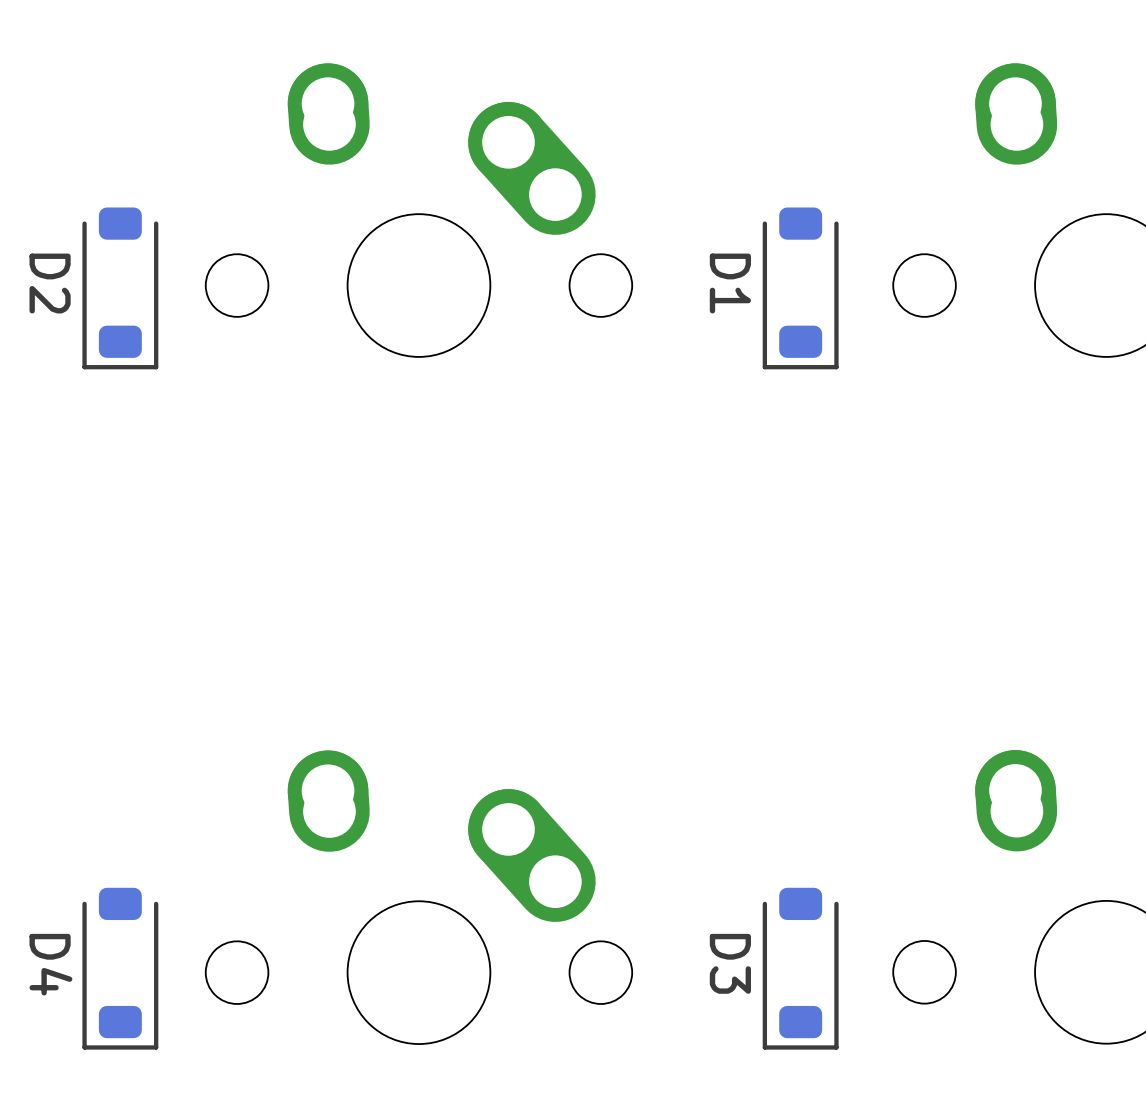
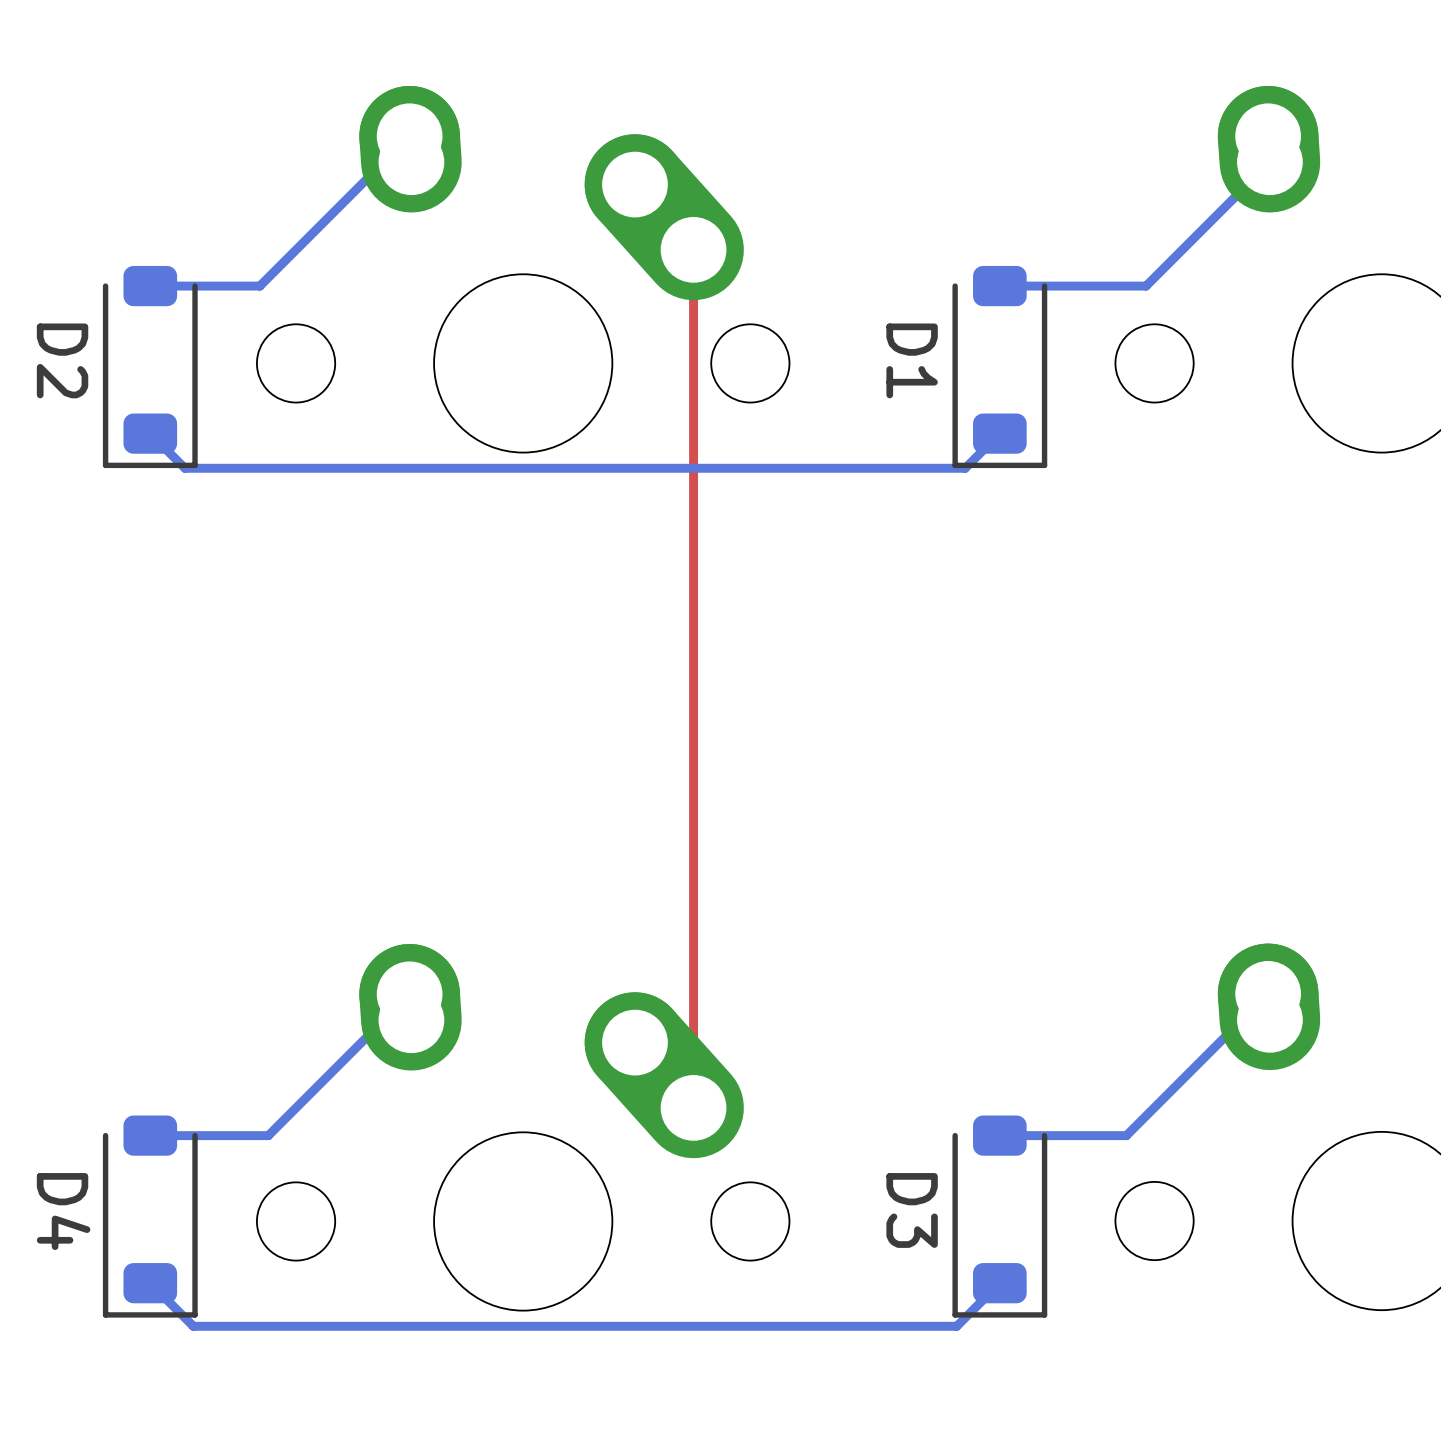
bottom track: none -> (409, 136) (259, 286) (150, 286)
bottom track: none -> (1269, 162) (1146, 286) (999, 286)
top track: none -> (693, 249) (693, 1107)
bottom track: none -> (999, 433) (965, 468) (184, 468) (150, 433)
bottom track: none -> (409, 994) (268, 1135) (150, 1135)
bottom track: none -> (1268, 993) (1126, 1135) (999, 1135)
bottom track: none -> (999, 1283) (956, 1326) (193, 1326) (150, 1283)

